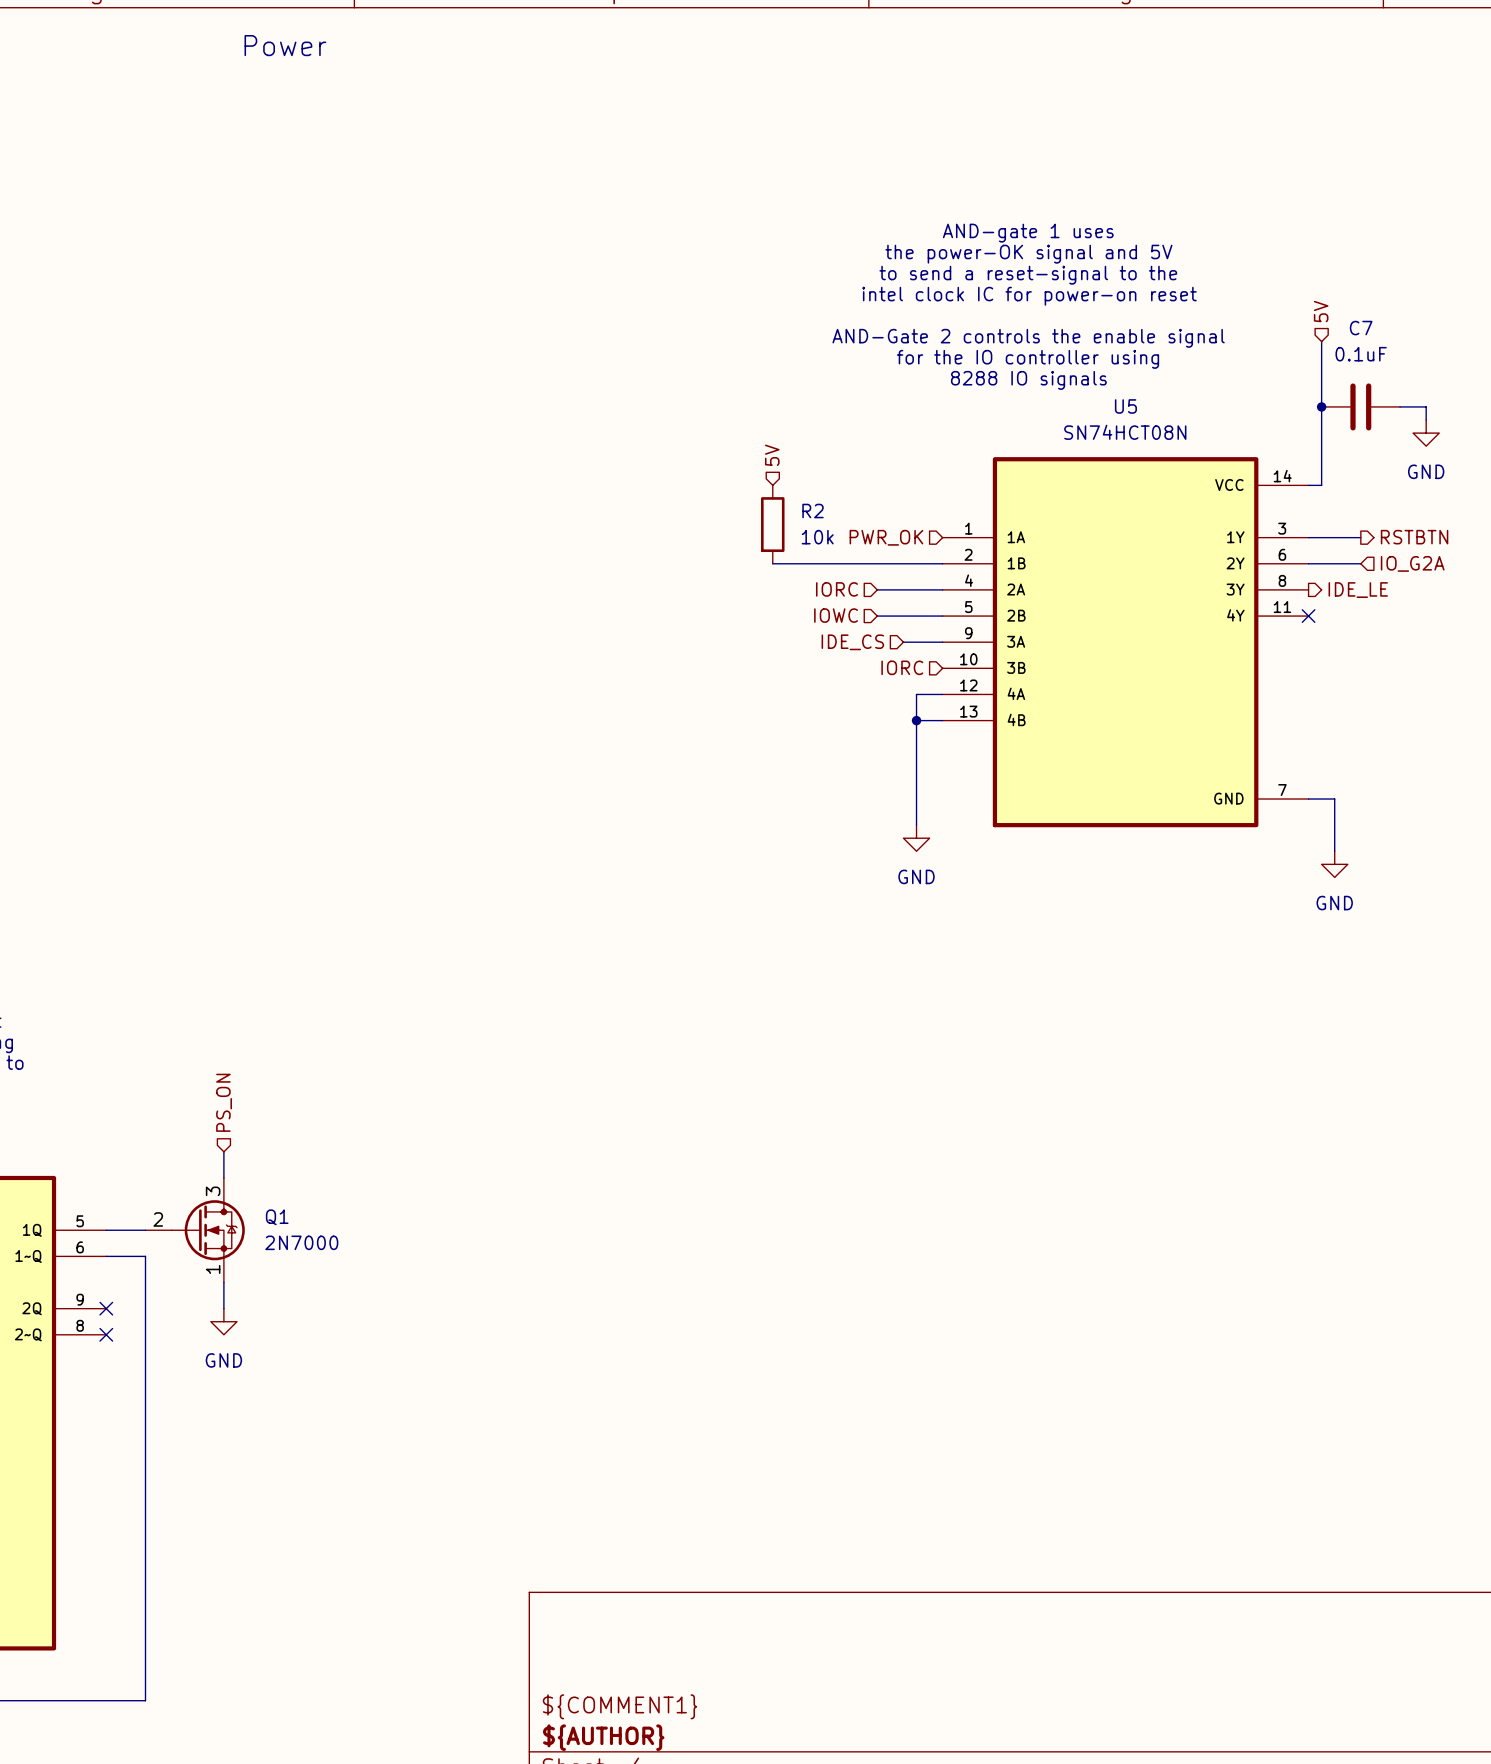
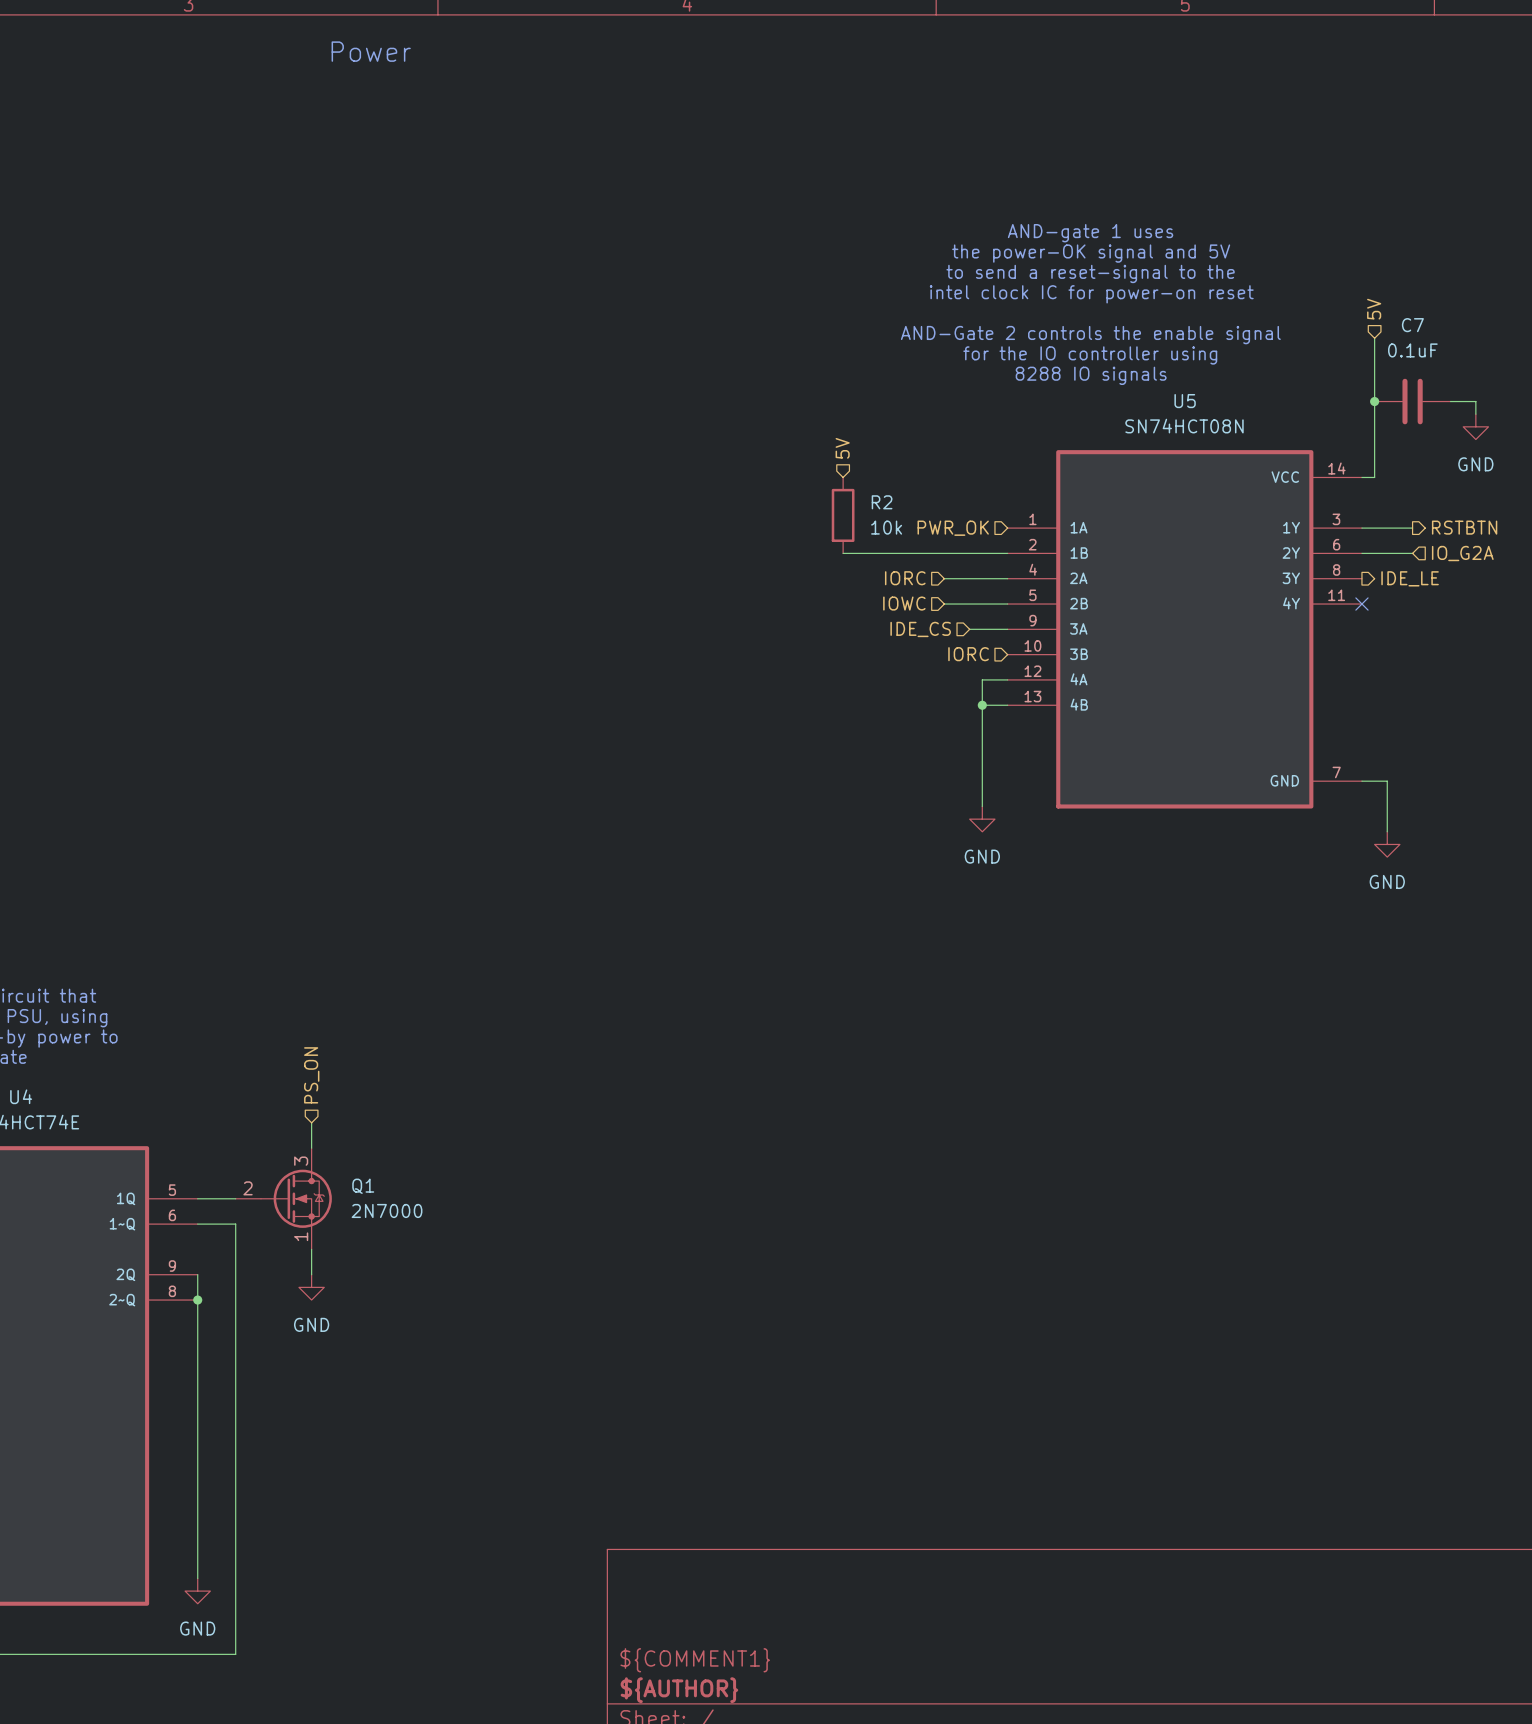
wire: none -> (197, 1274) (197, 1578)
no-connect mark: (106, 1308) -> none
no-connect mark: (106, 1334) -> none
junction: none -> (197, 1300)
power symbol: none -> GND (197, 1591)

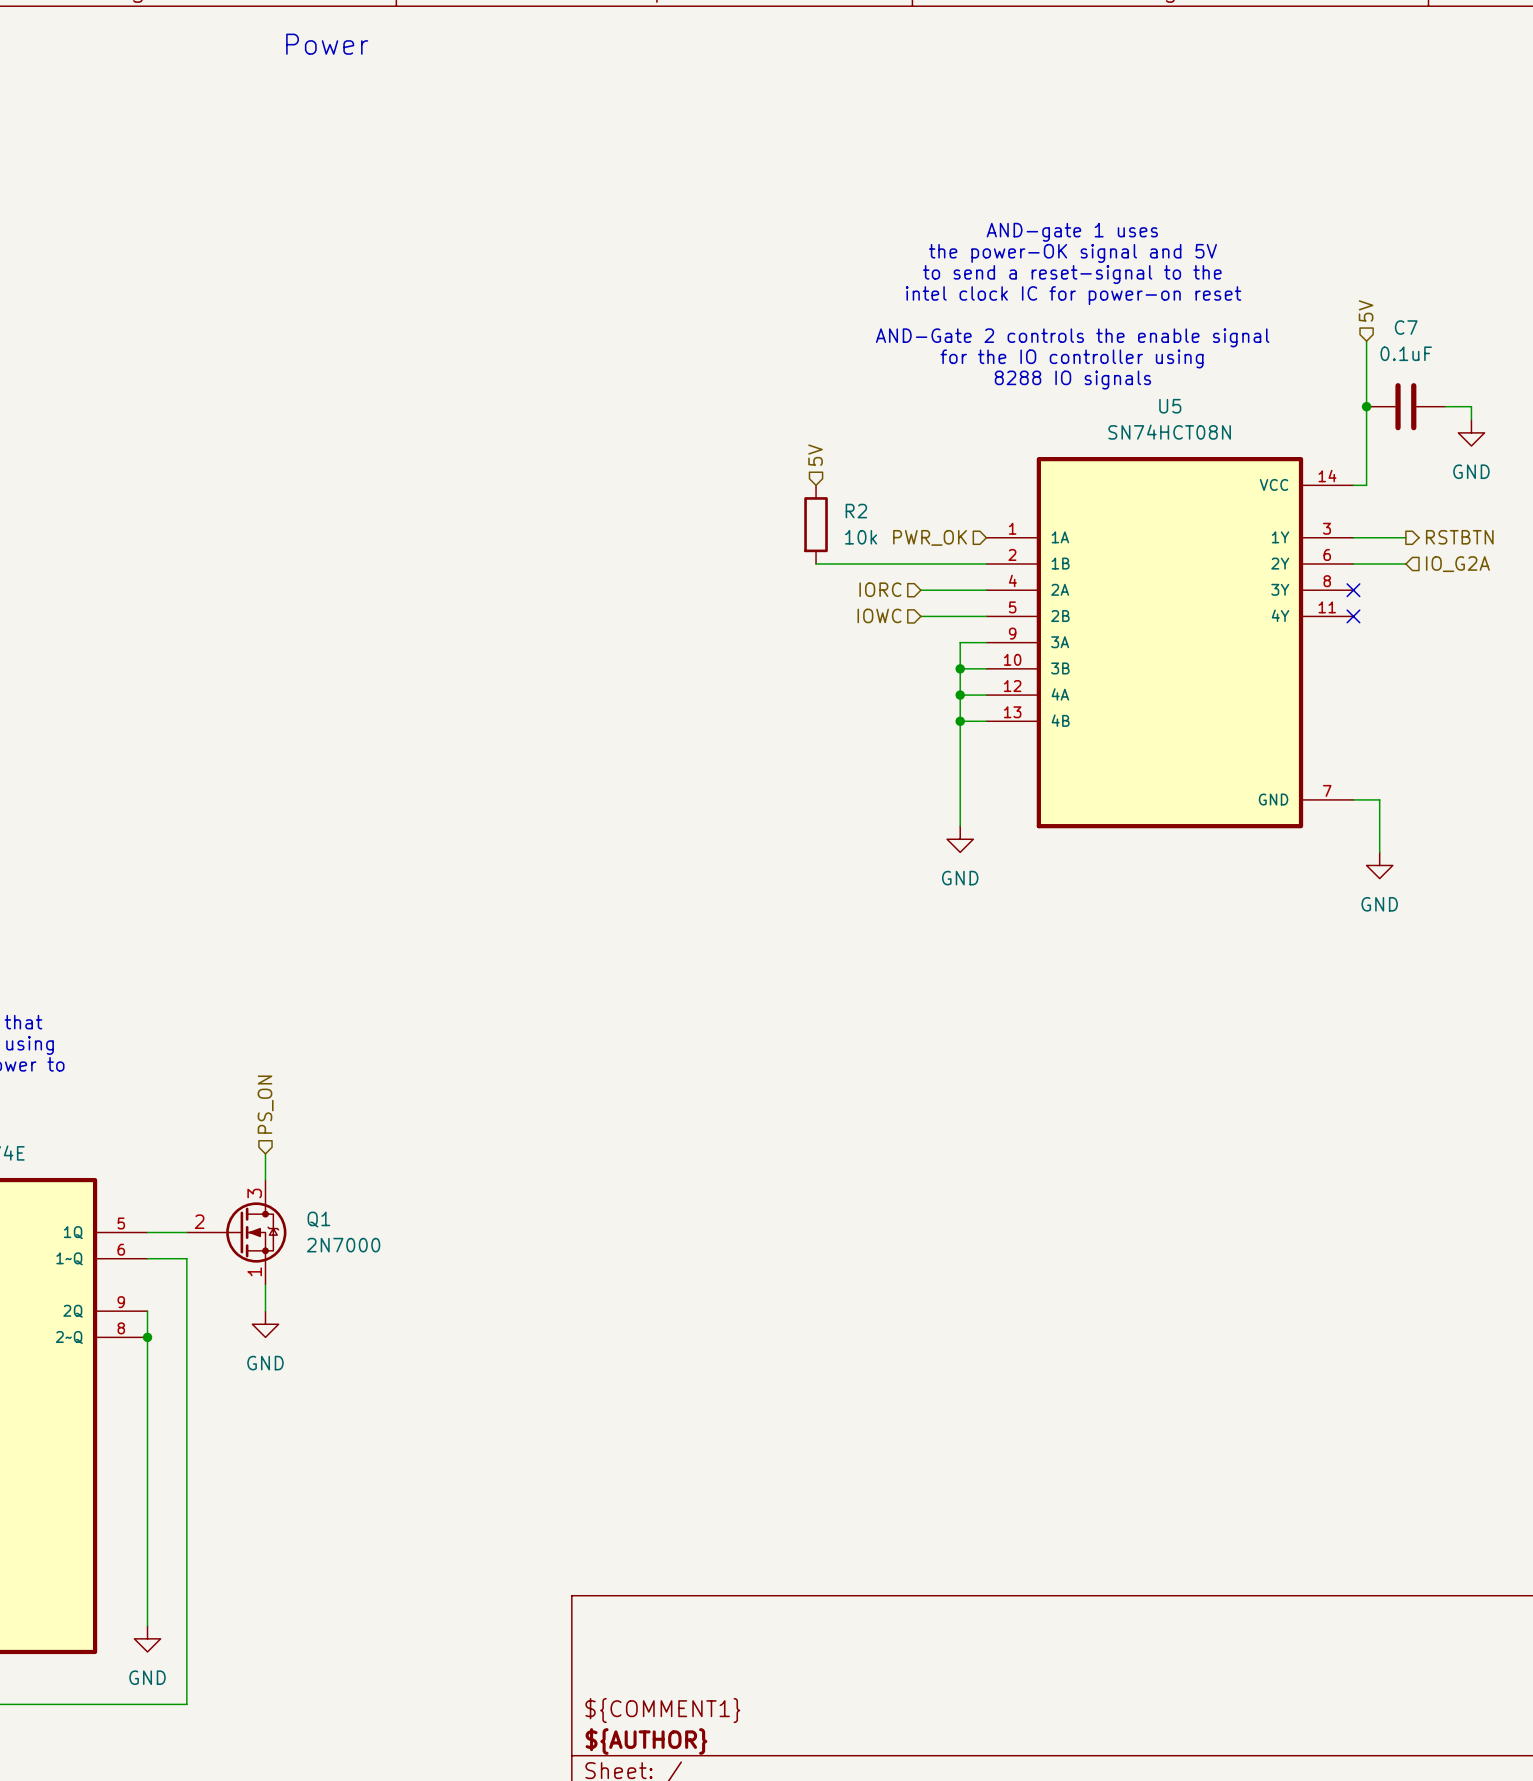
no-connect mark: none -> (1353, 590)
hierarchical label: IDE_LE (1410, 578) -> none
hierarchical label: IDE_CS (920, 629) -> none
wire: (969, 629) (982, 629) -> (960, 695) (960, 642)
hierarchical label: IORC (968, 654) -> none
wire: none -> (960, 668) (986, 668)
junction: none -> (960, 668)
junction: none -> (960, 695)

